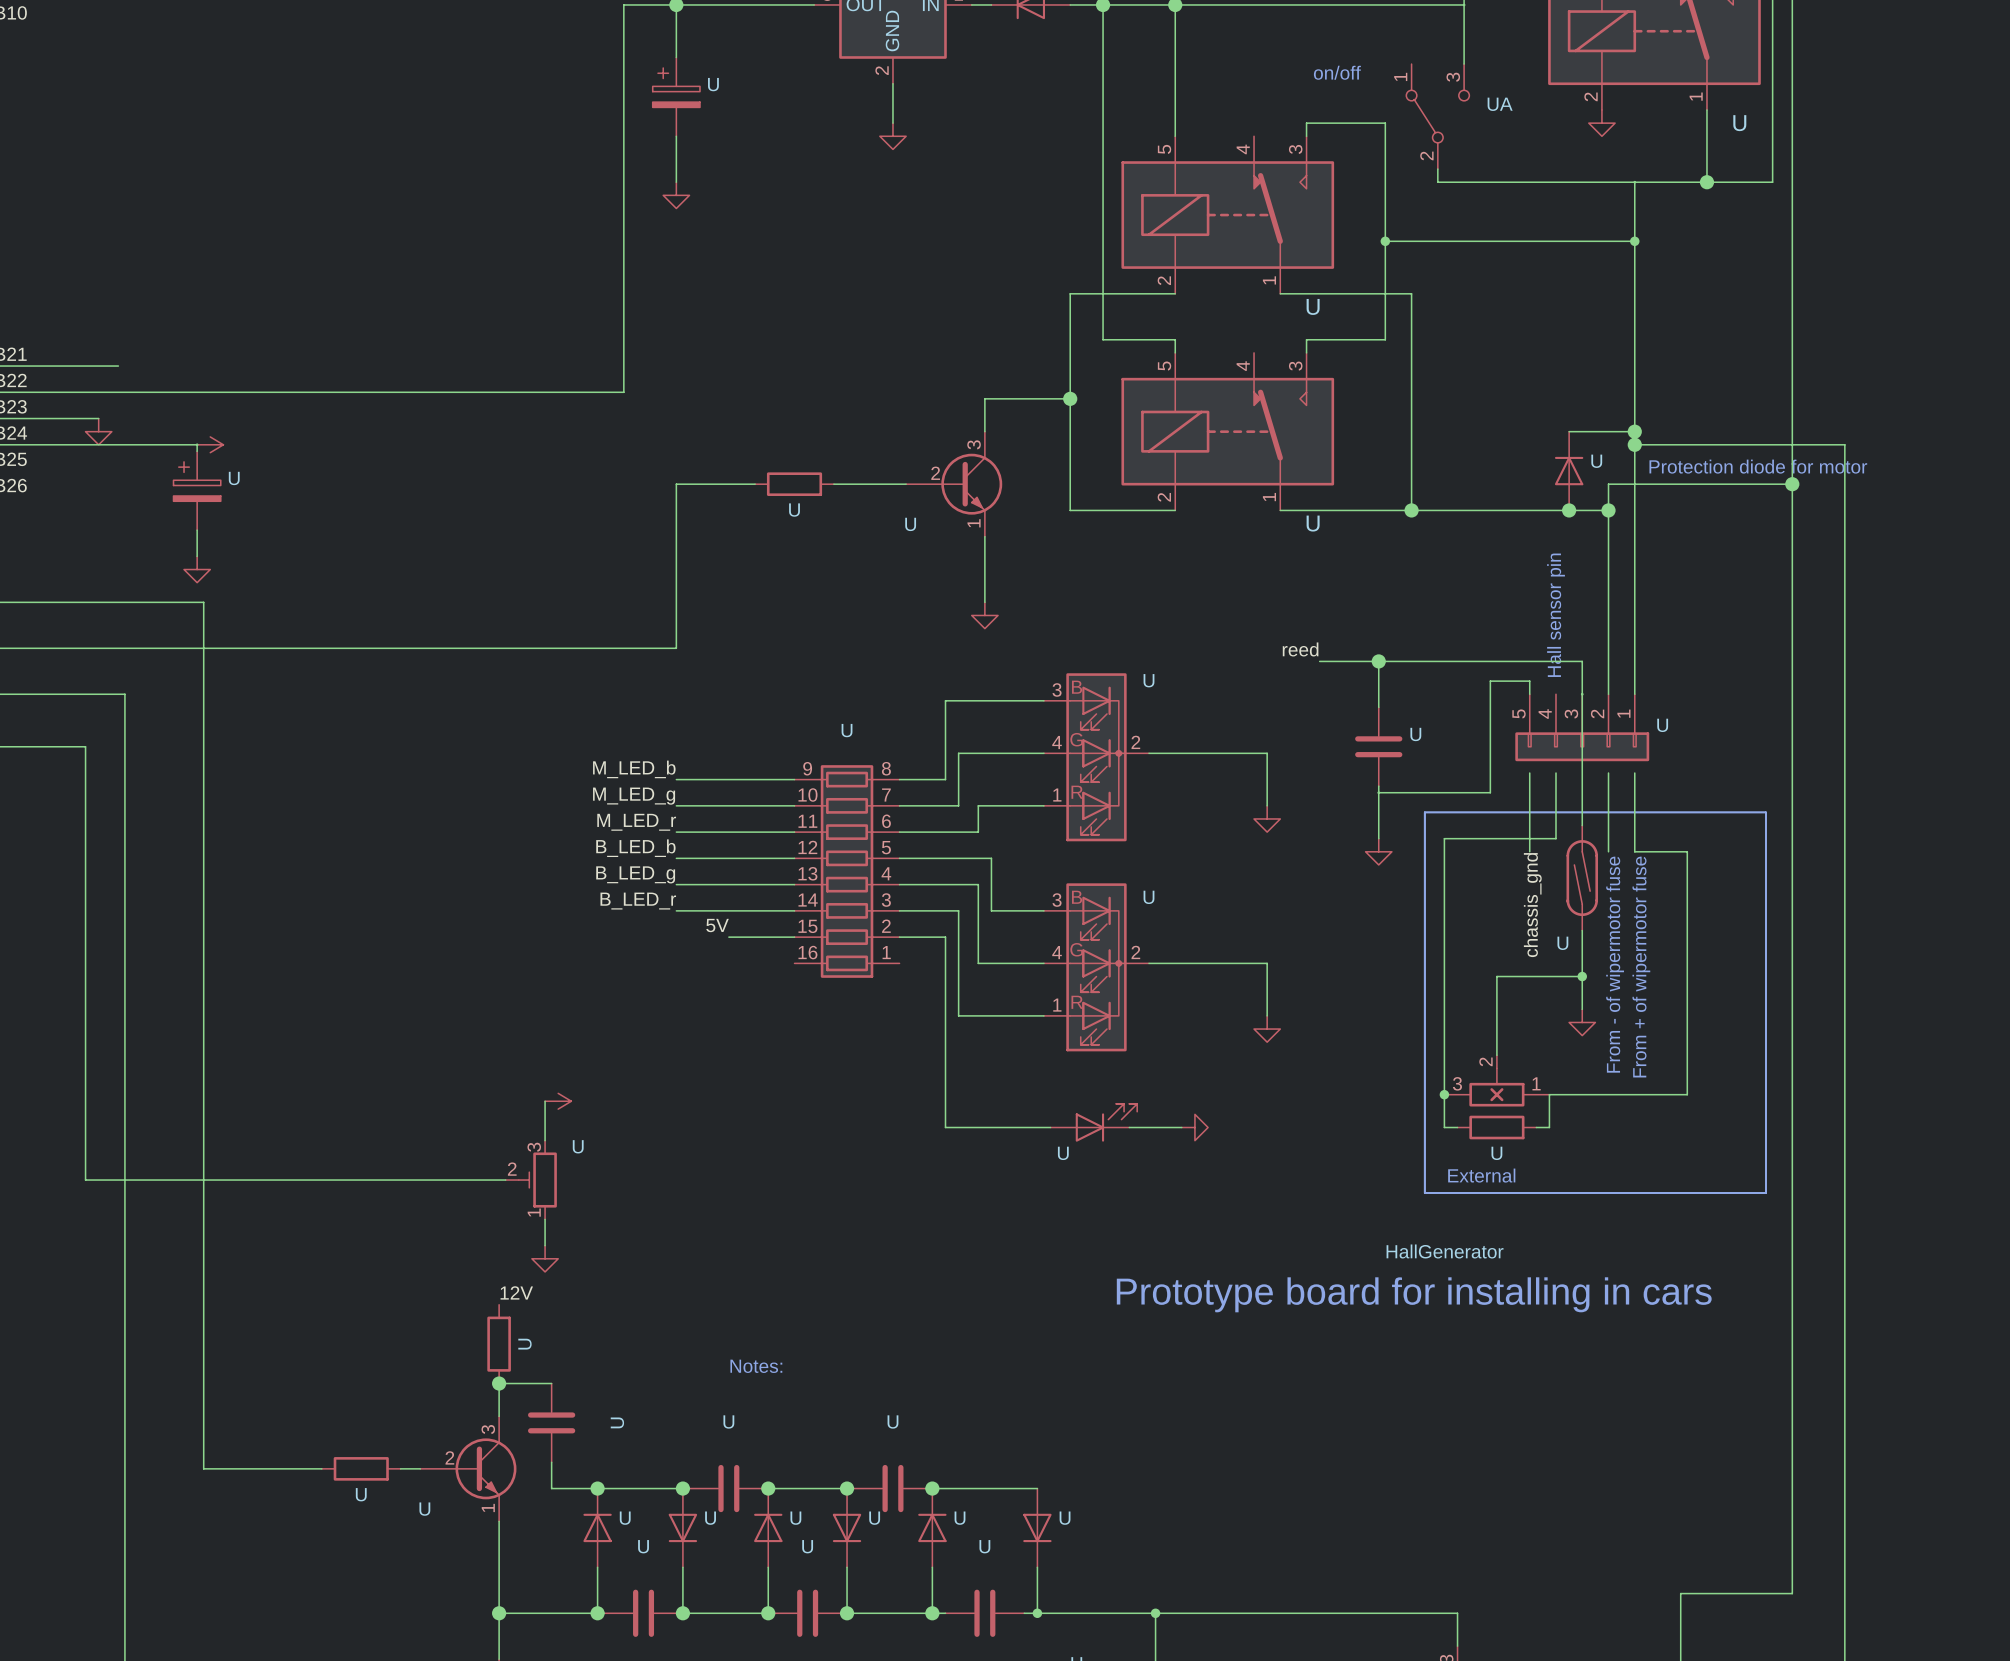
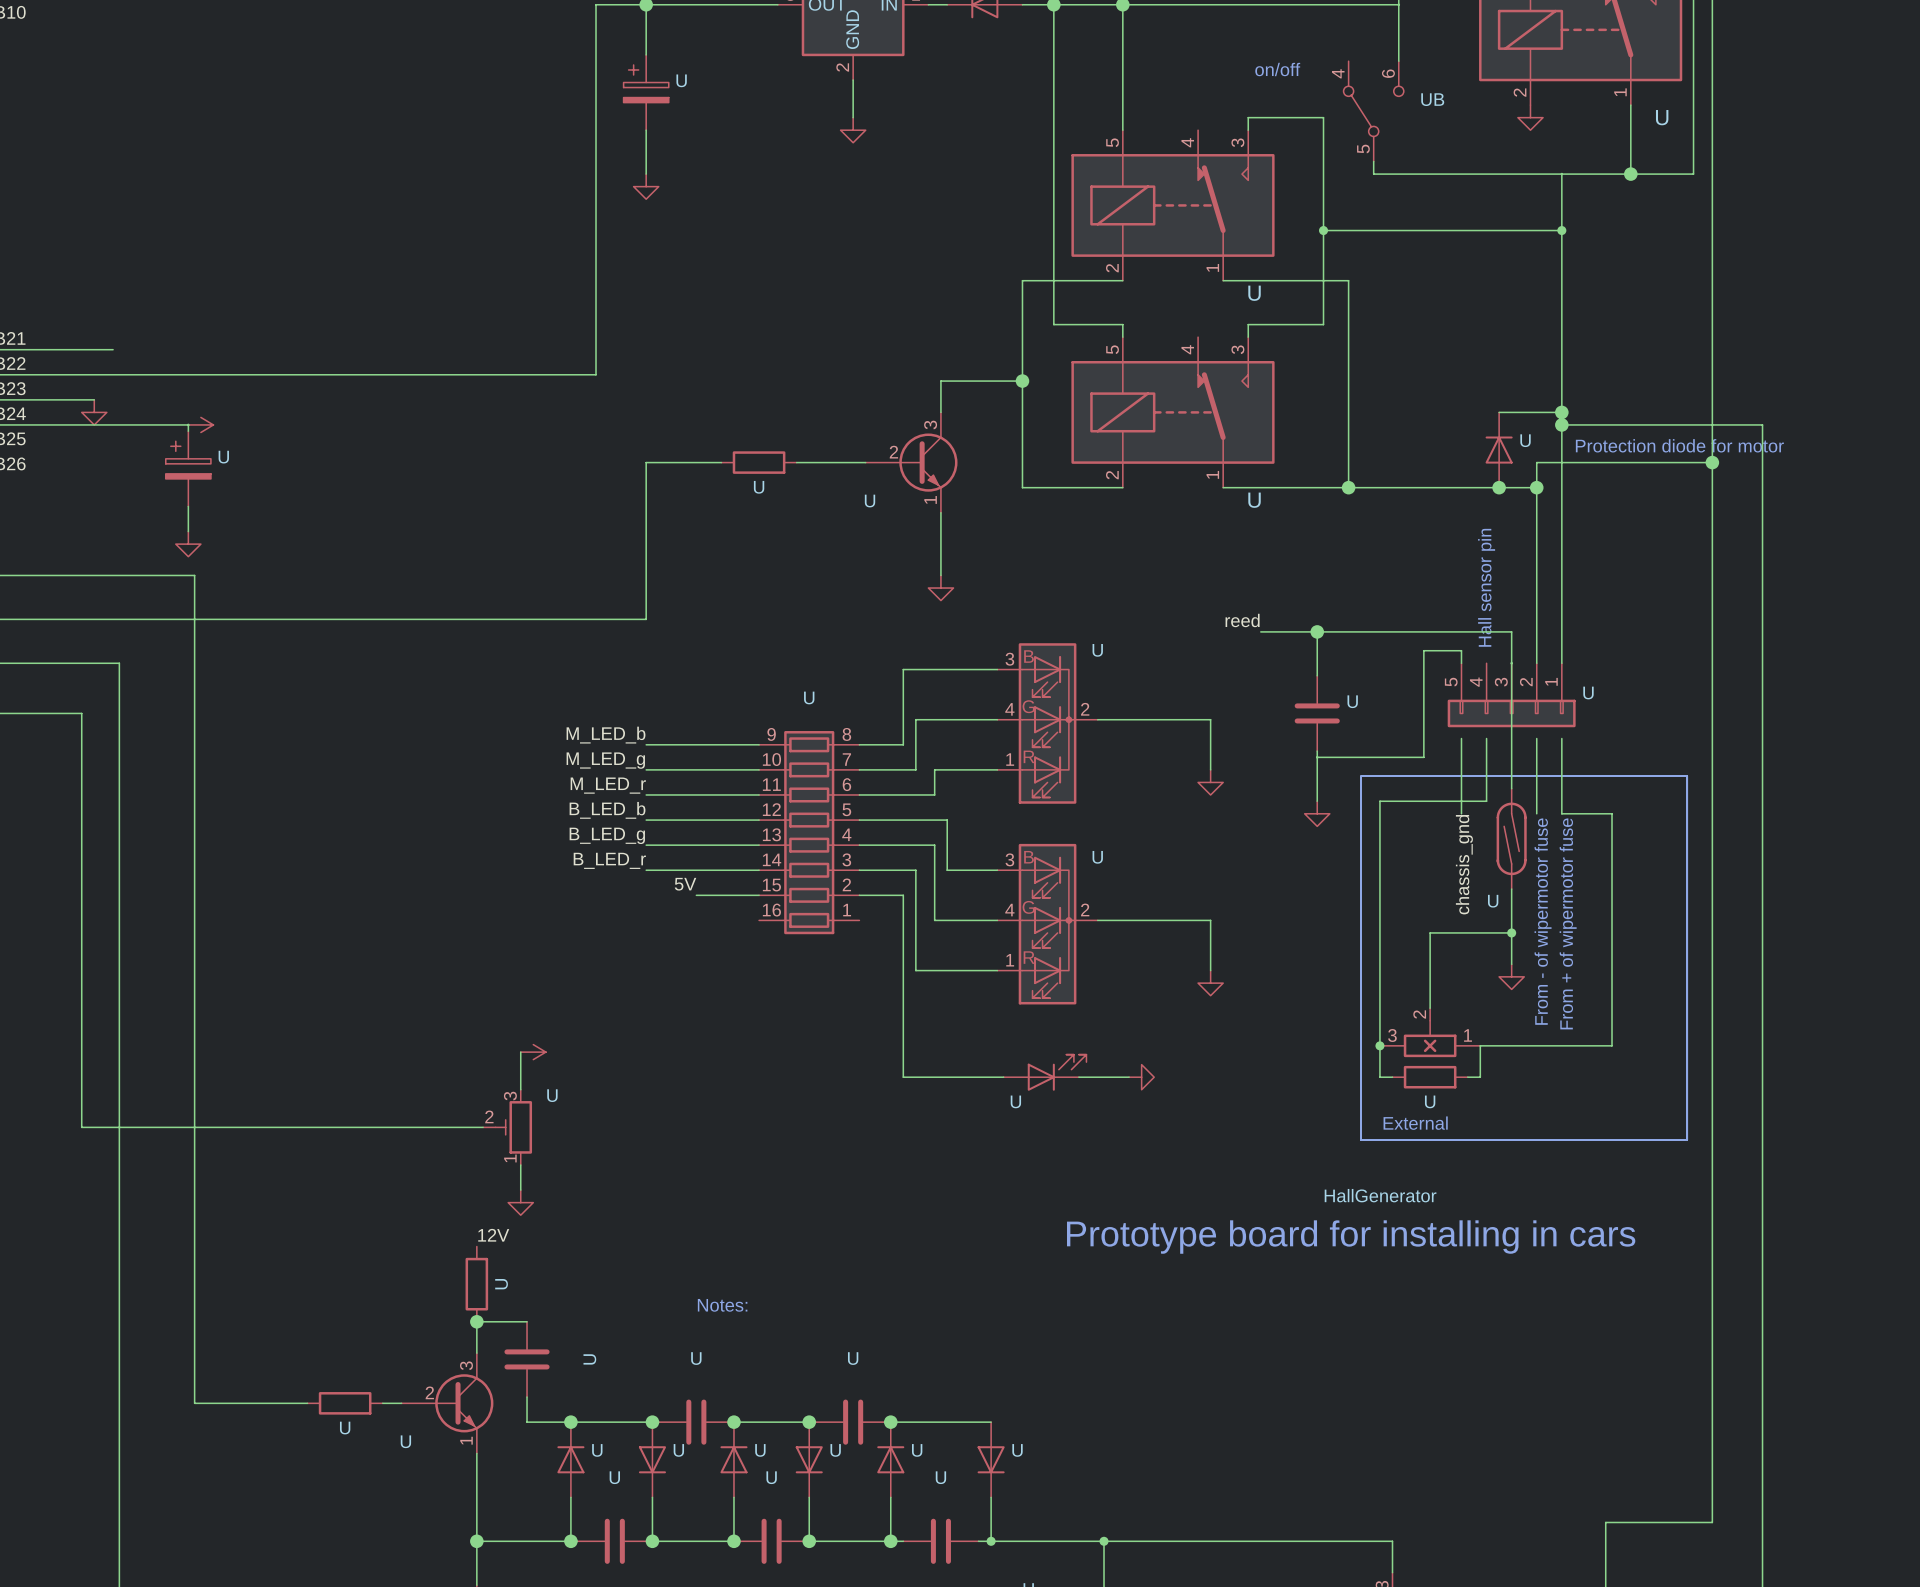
UA pin number: 1 (1400, 76) -> 4 (1338, 73)
UA pin number: 3 (1453, 77) -> 6 (1388, 73)
UA name: UA (1500, 104) -> UB (1432, 99)
UA pin number: 2 (1426, 155) -> 5 (1363, 149)

